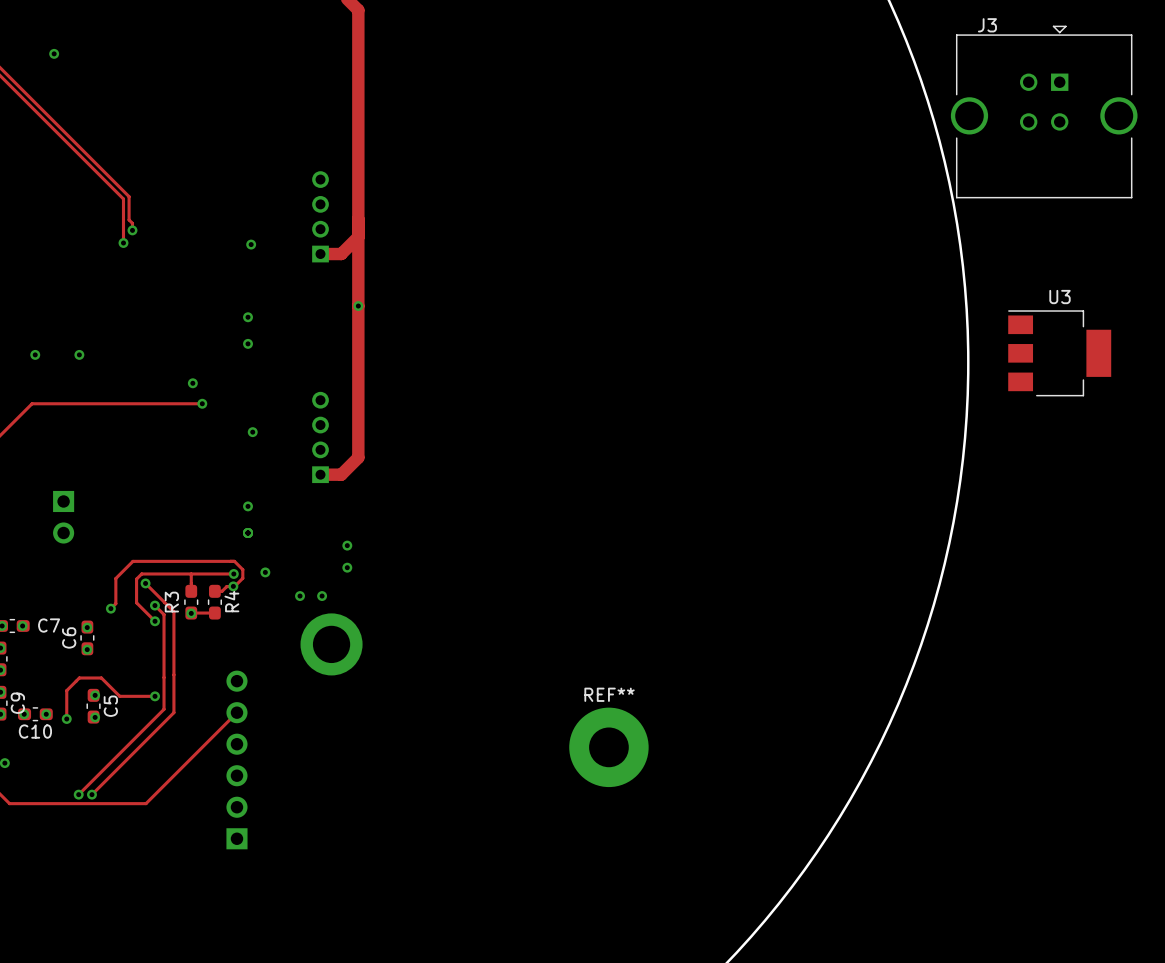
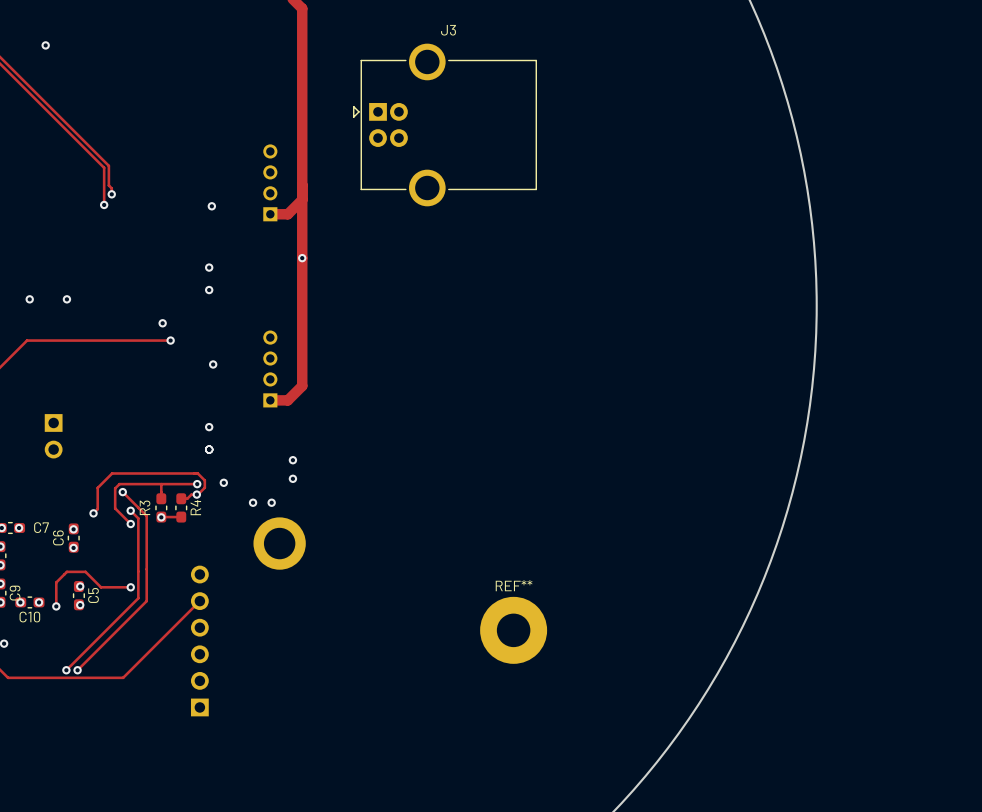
J3 footprint: [950, 25, 1138, 199] -> [353, 43, 537, 207]
J3 name position: J3 (987, 25) -> J3 (448, 30)
U3: (1059, 353) -> none

